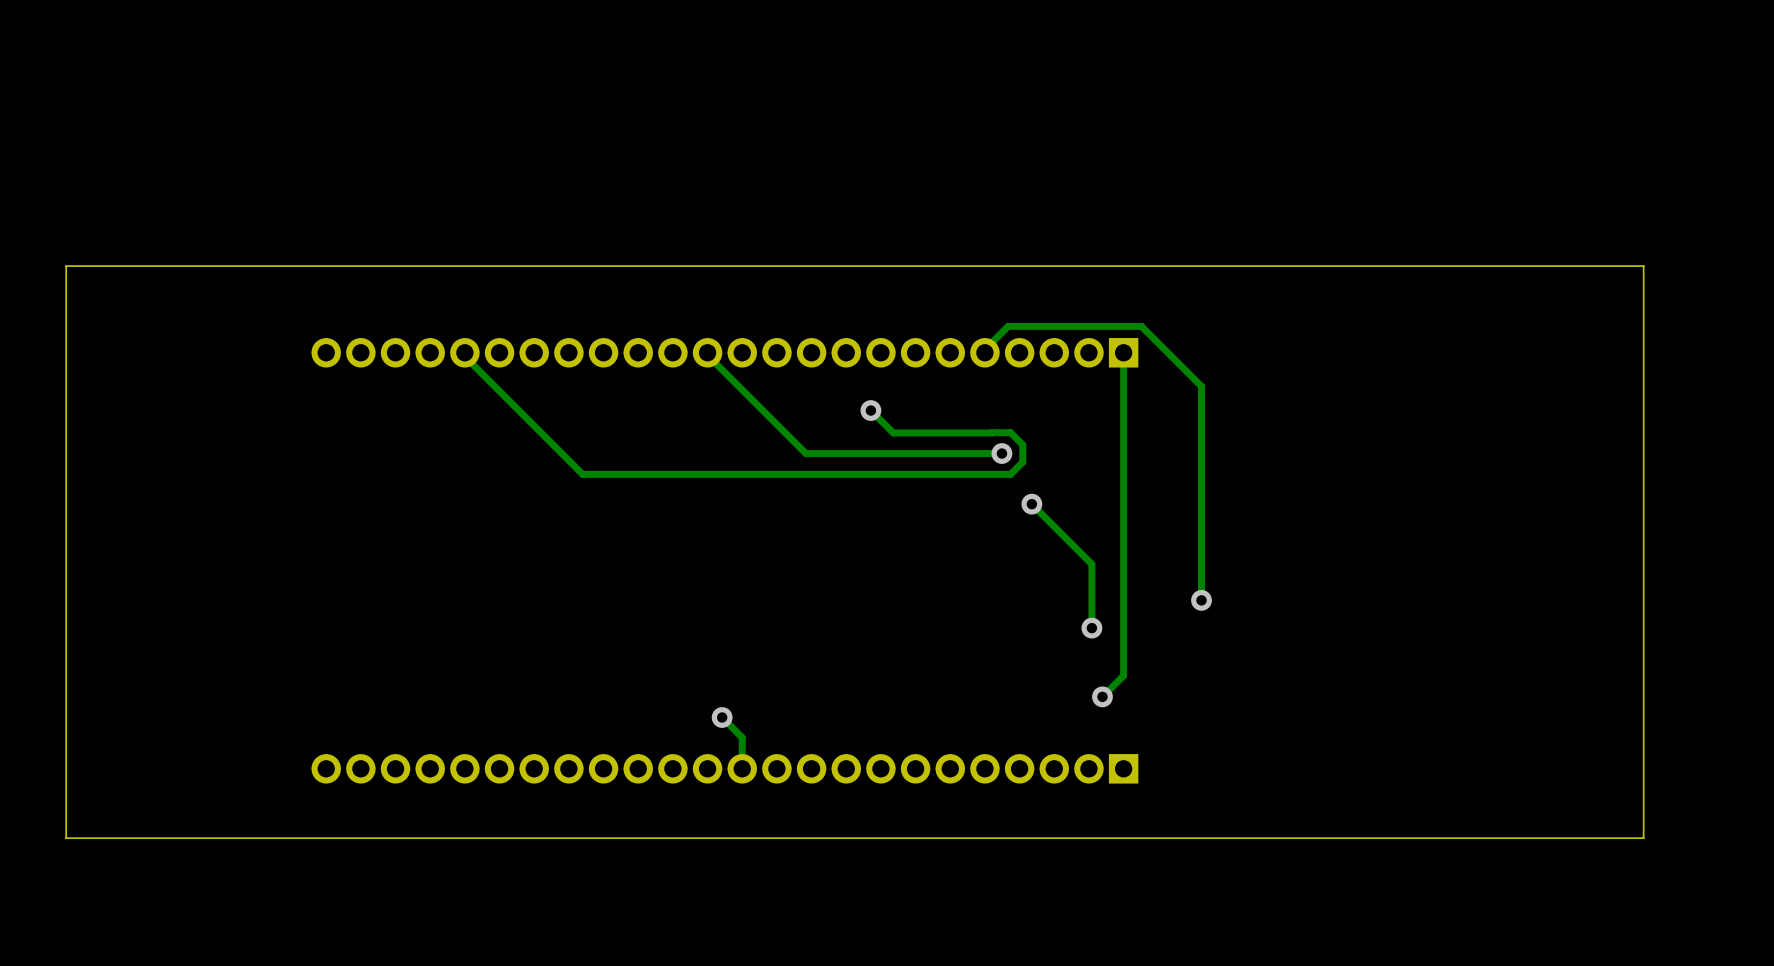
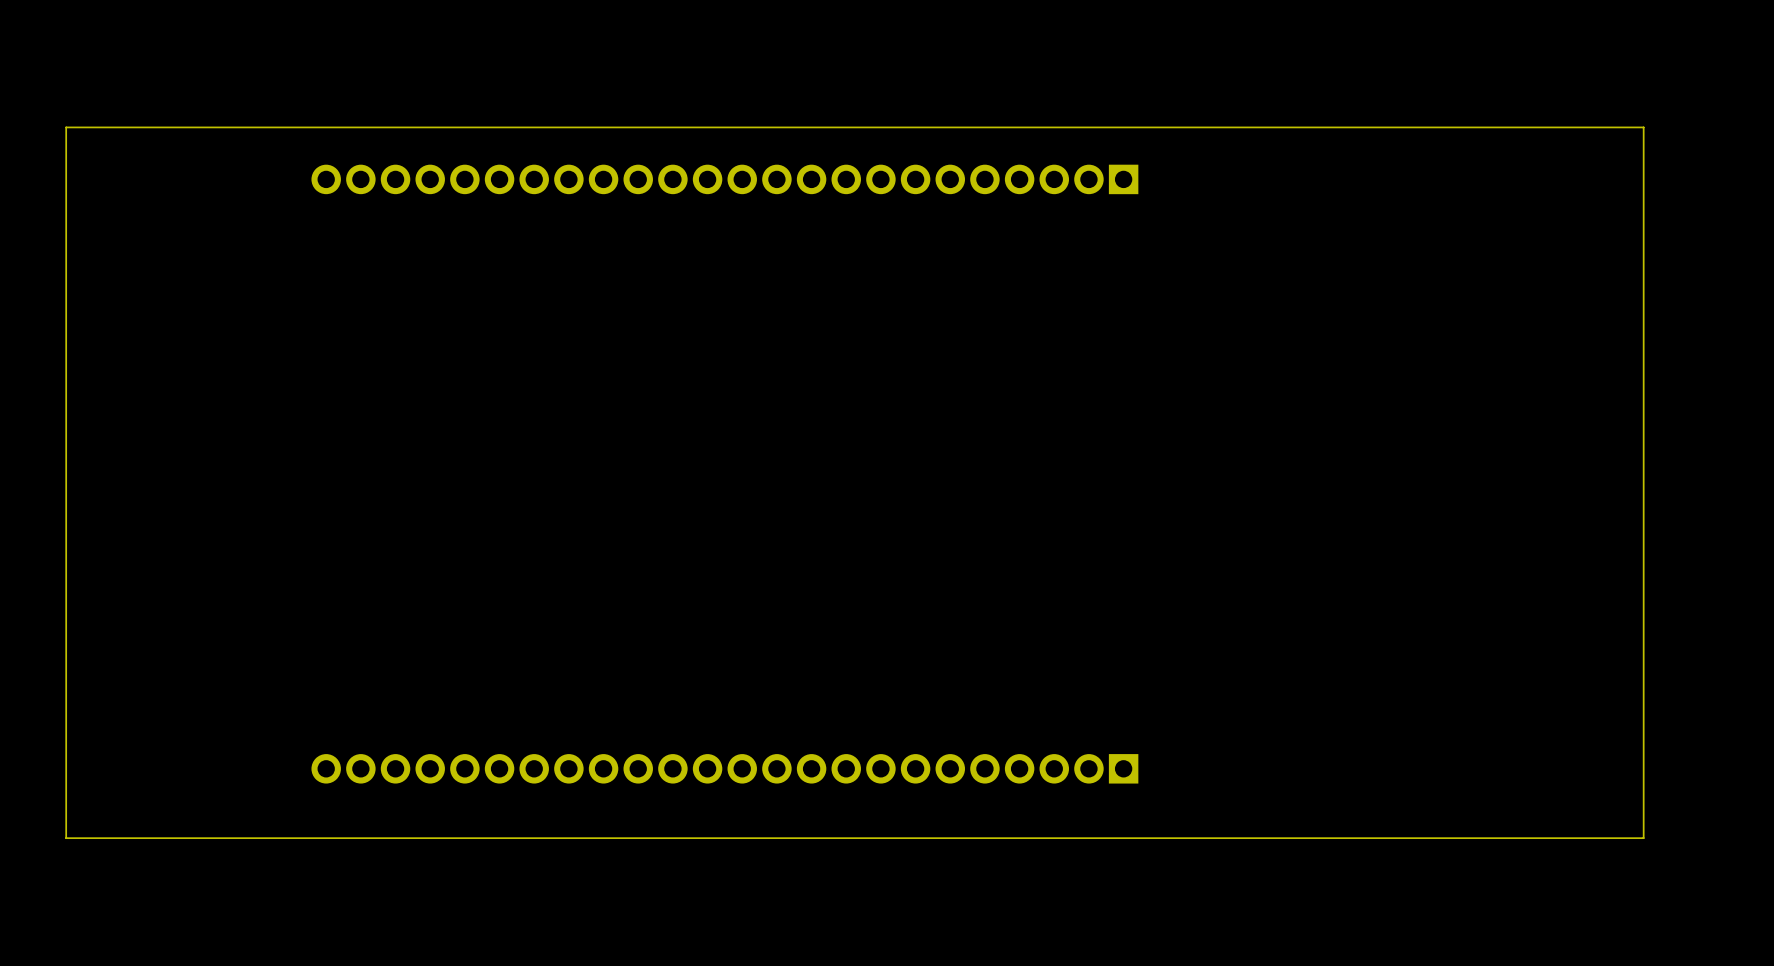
board edge: (1643, 266) (66, 266) -> (1643, 266) (1643, 127) (66, 127) (66, 266)
track: (464, 352) (464, 356) (582, 474) (1010, 474) (1022, 462) (1022, 444) (1010, 432) (992, 432) -> none
track: (707, 352) (707, 355) (805, 453) (1001, 453) -> none
part position: (724, 352) -> (724, 179)
track: (984, 352) (984, 349) (1008, 326) (1141, 326) (1201, 386) (1201, 600) -> none
track: (1123, 352) (1123, 675) (1102, 696) -> none
track: (870, 410) (893, 432) (992, 432) -> none
via: (870, 410) -> none
via: (1001, 453) -> none
track: (1031, 504) (1091, 564) (1091, 628) -> none
via: (1031, 504) -> none
via: (1201, 600) -> none
via: (1091, 628) -> none
via: (1102, 696) -> none
track: (722, 717) (742, 737) (742, 768) -> none
via: (722, 717) -> none

